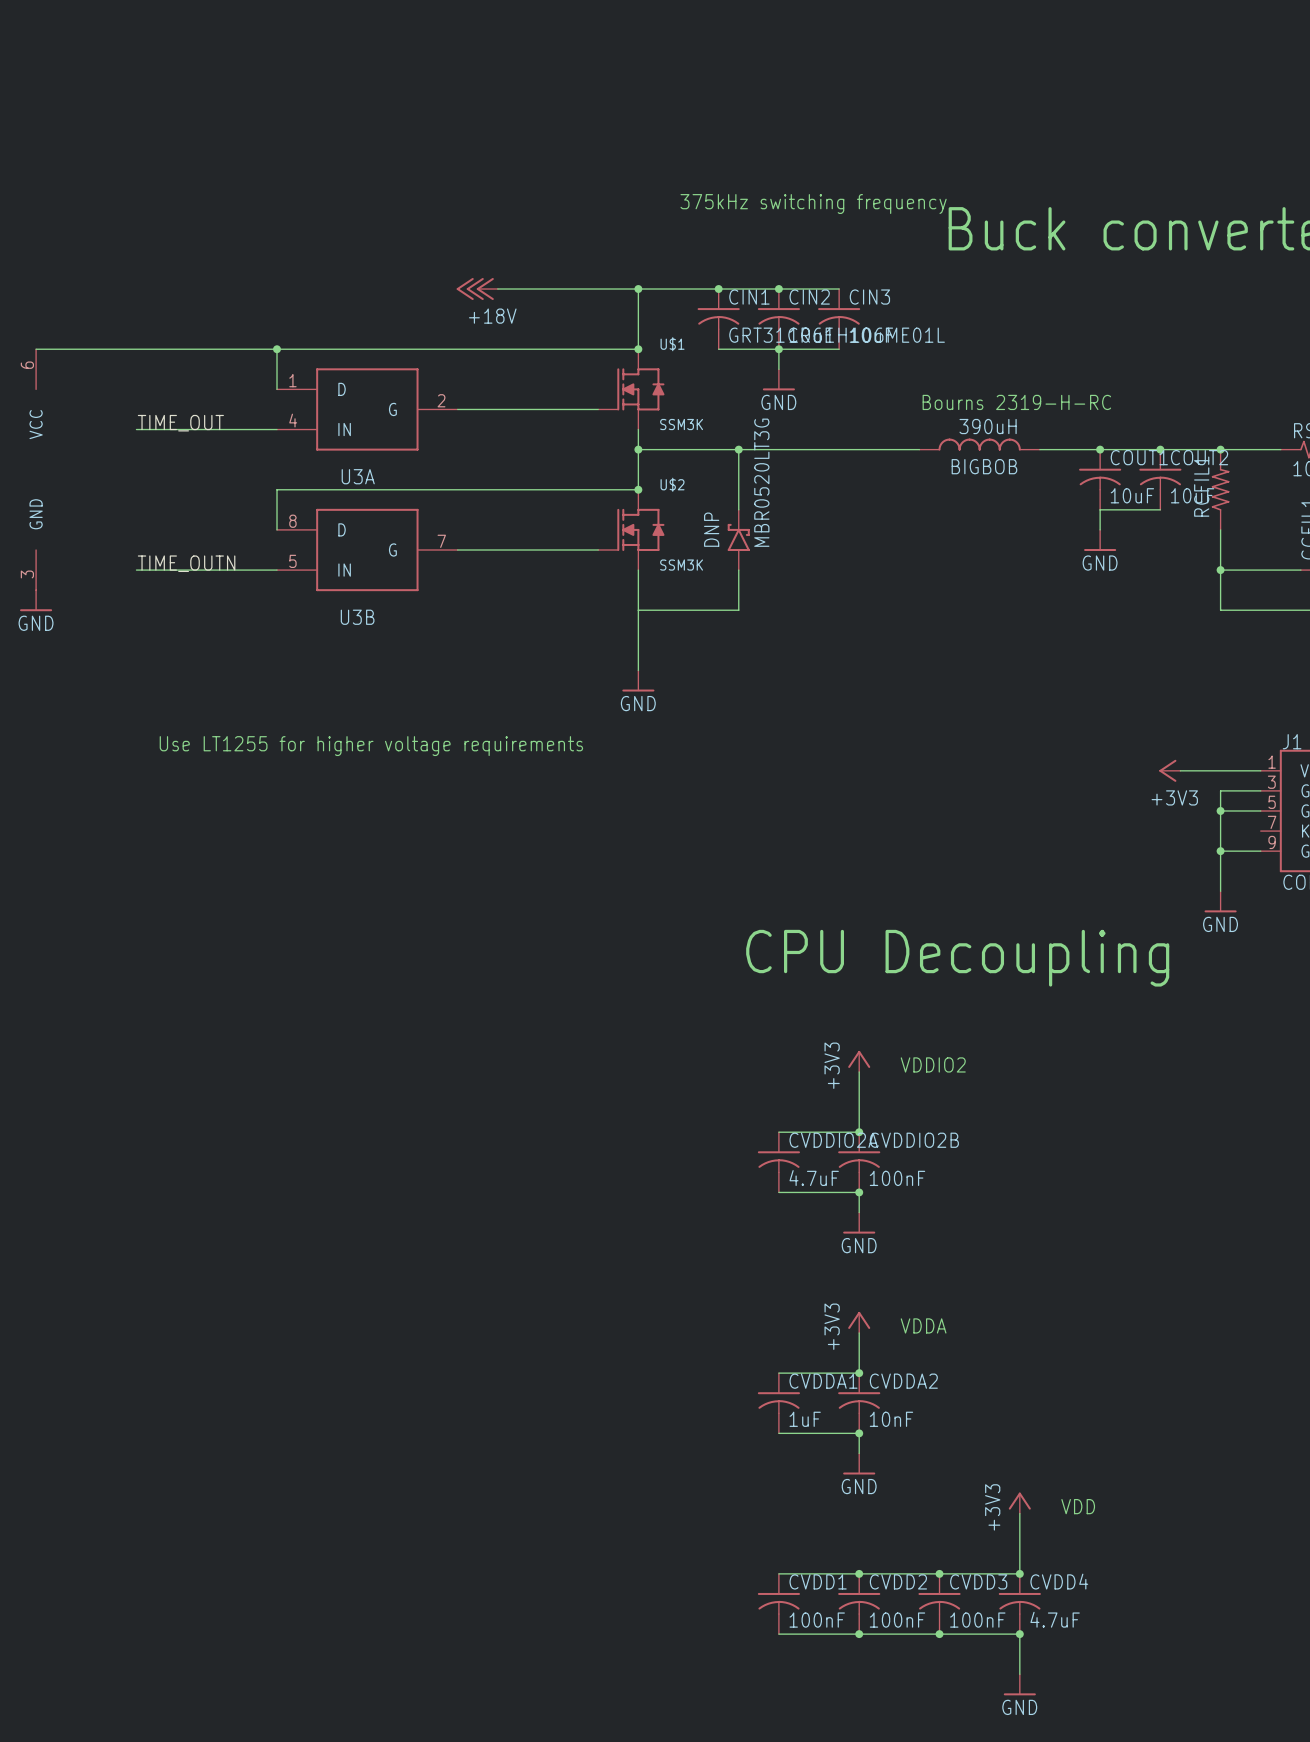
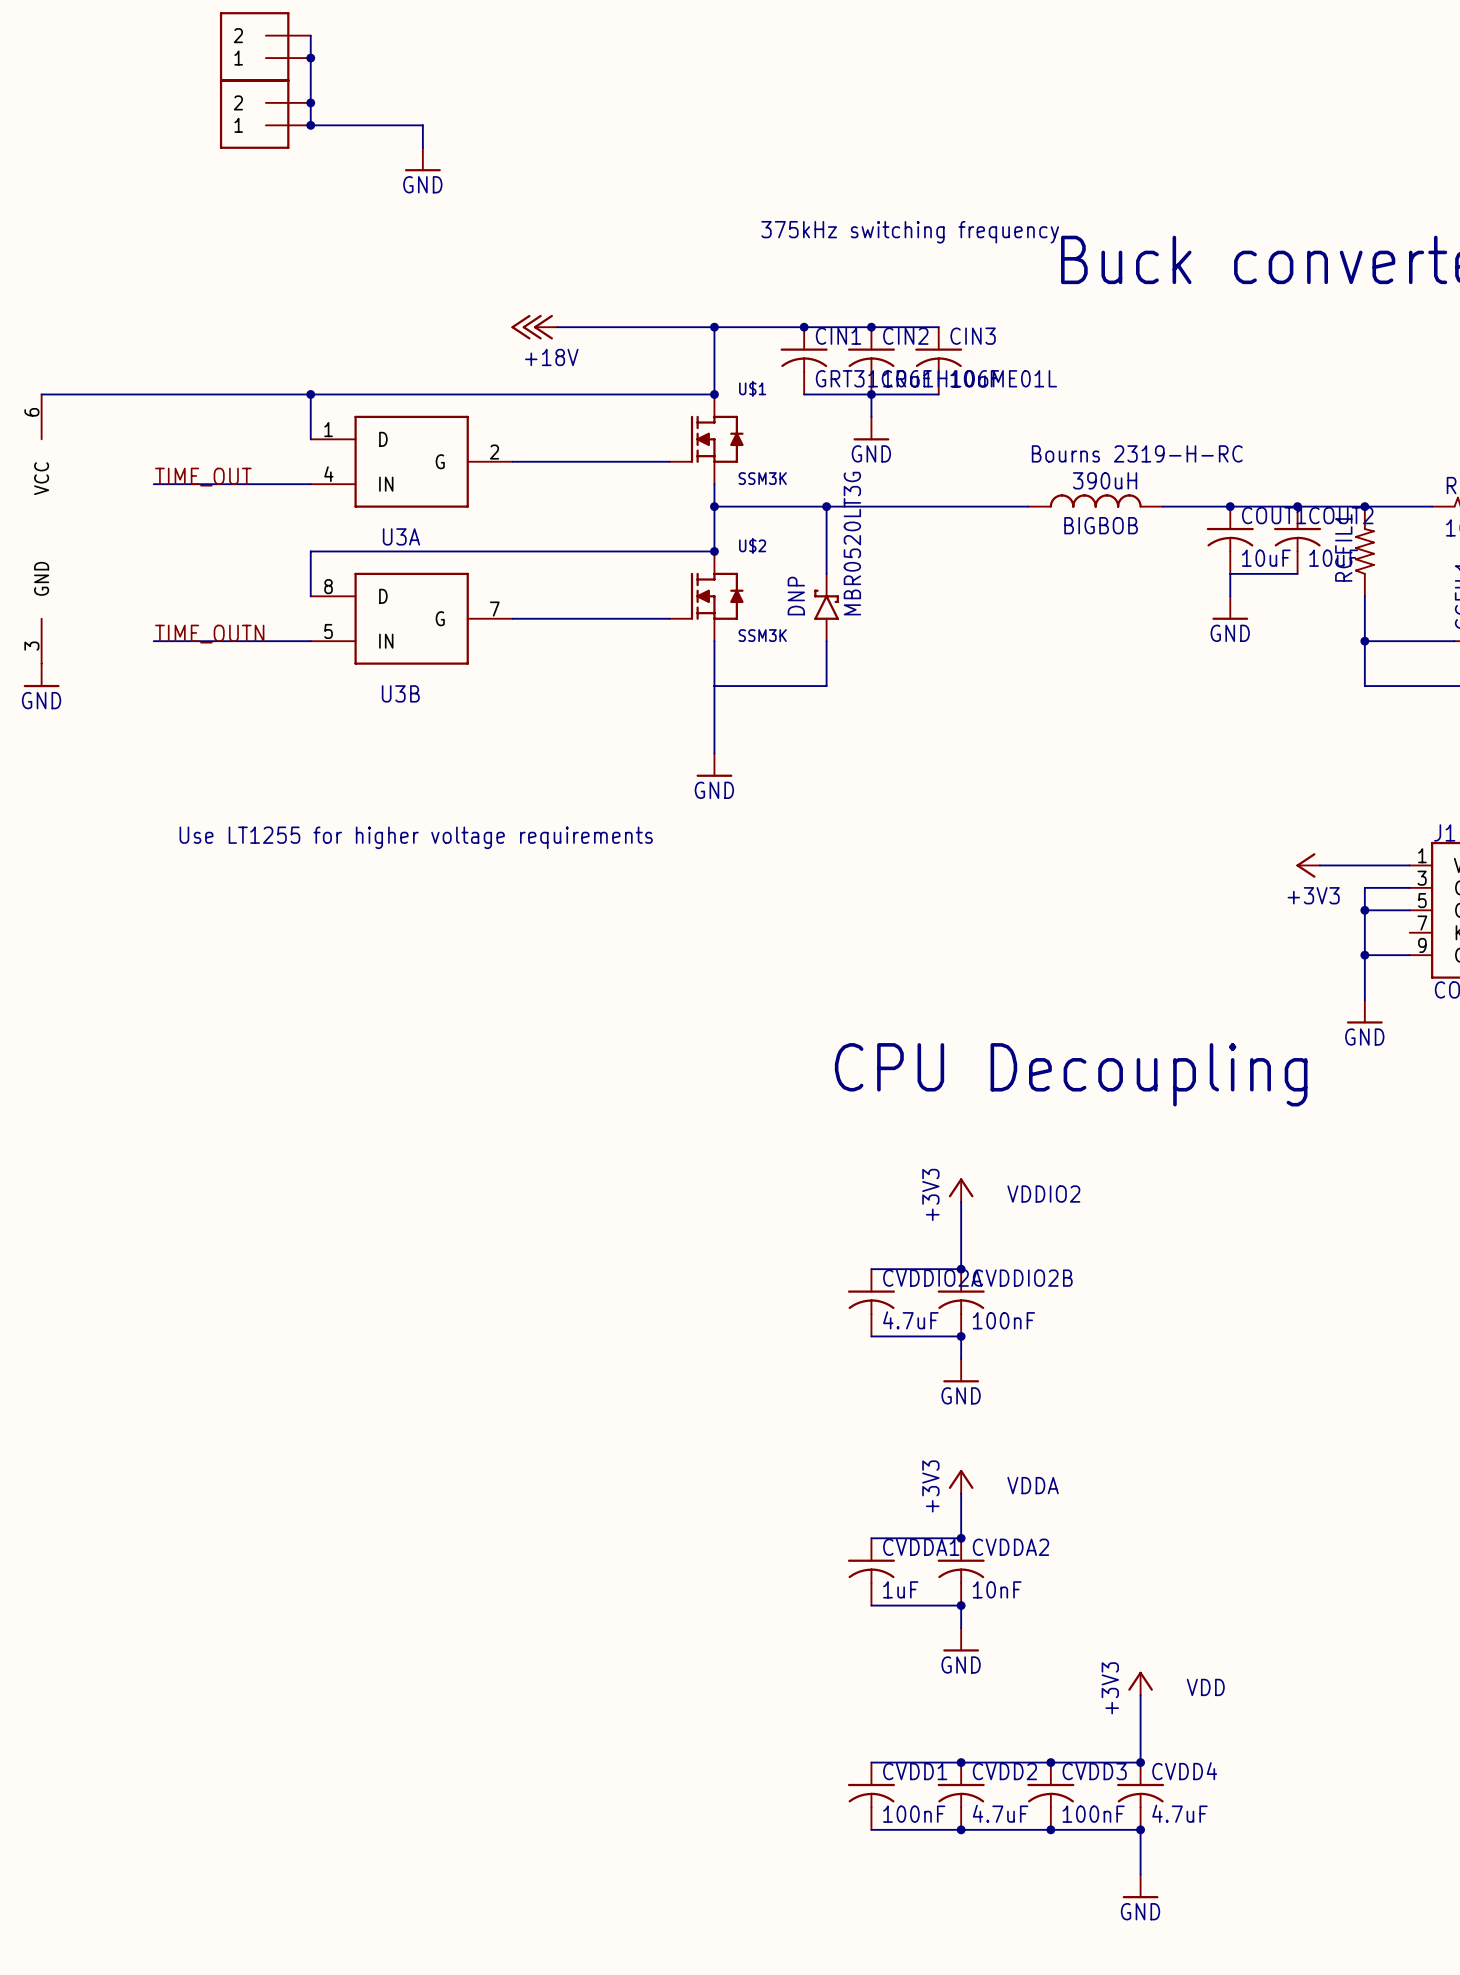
wire: none -> (310, 35) (310, 125) (422, 125) (422, 147)
part: none -> (265, 46)
junction: none -> (310, 58)
junction: none -> (310, 102)
part: none -> (265, 114)
junction: none -> (310, 125)
power symbol: none -> GND (422, 159)
CVDD2 value: 100nF (897, 1620) -> 4.7uF (1000, 1813)

